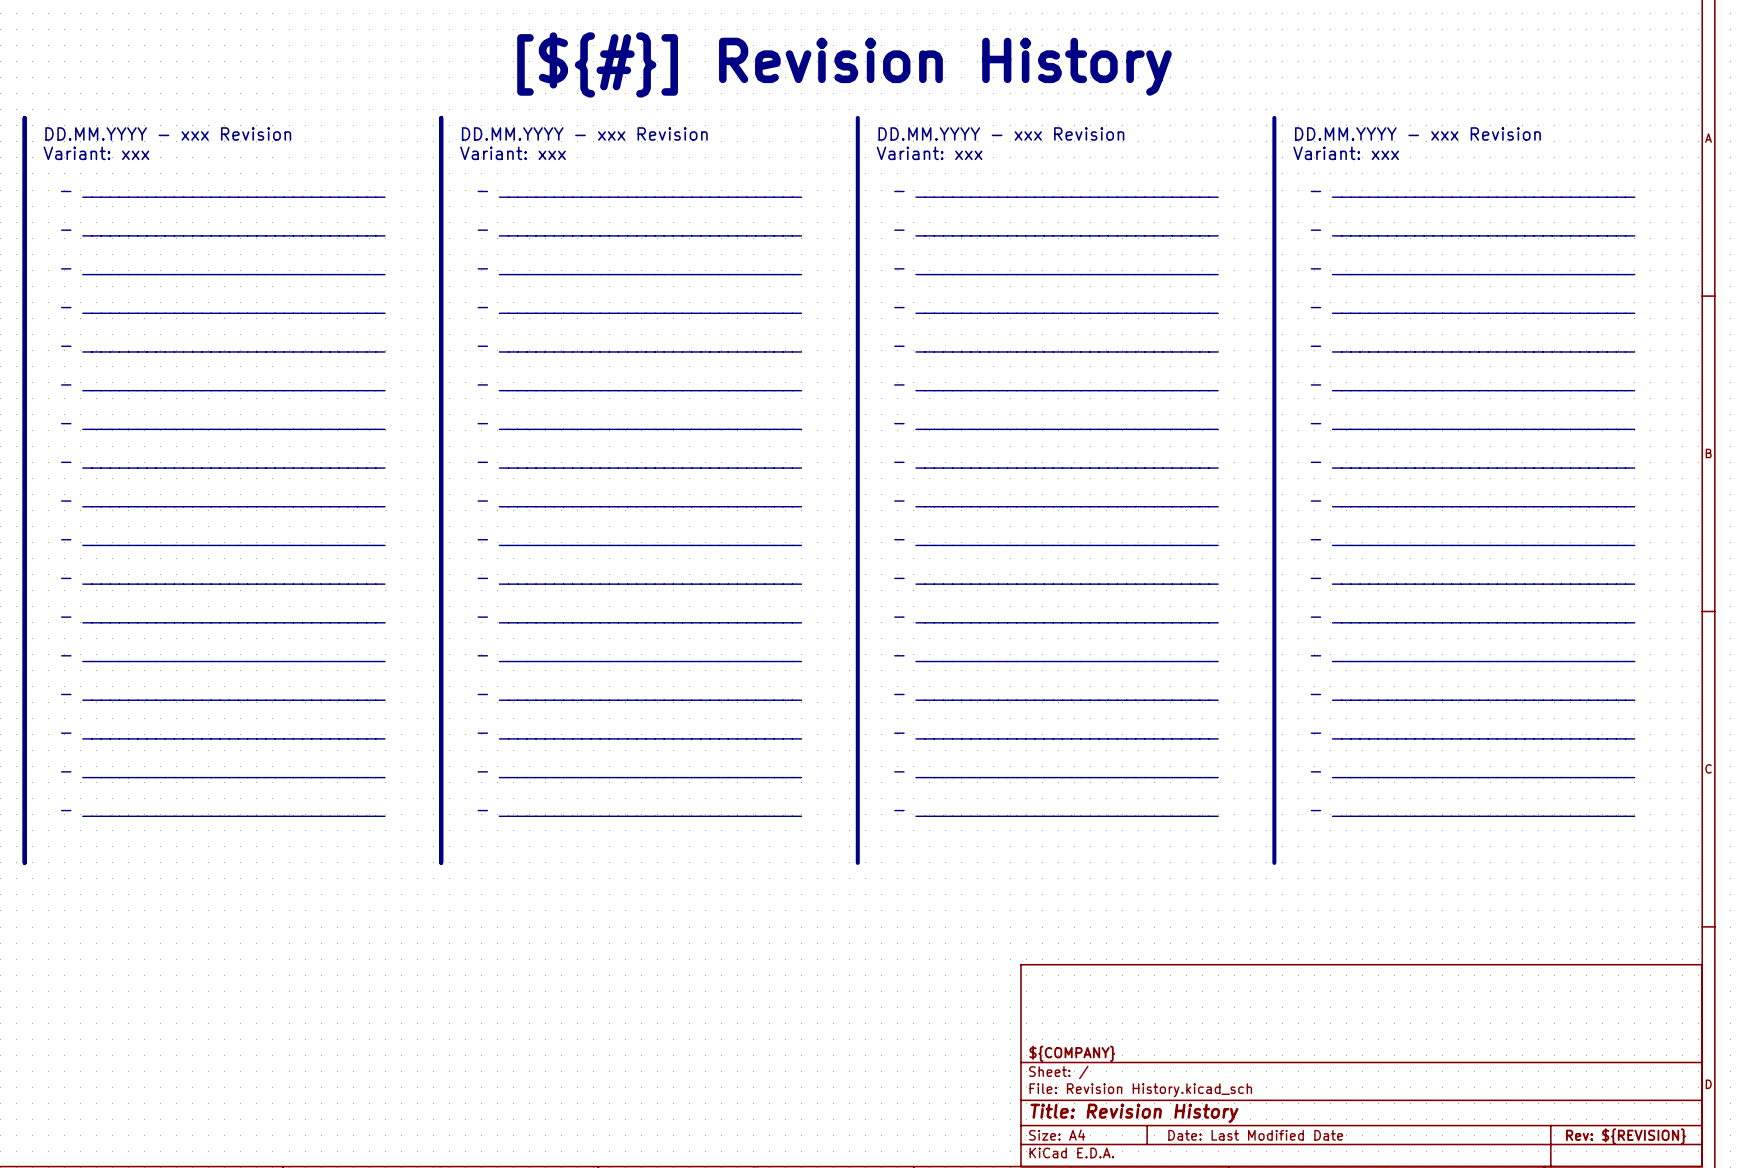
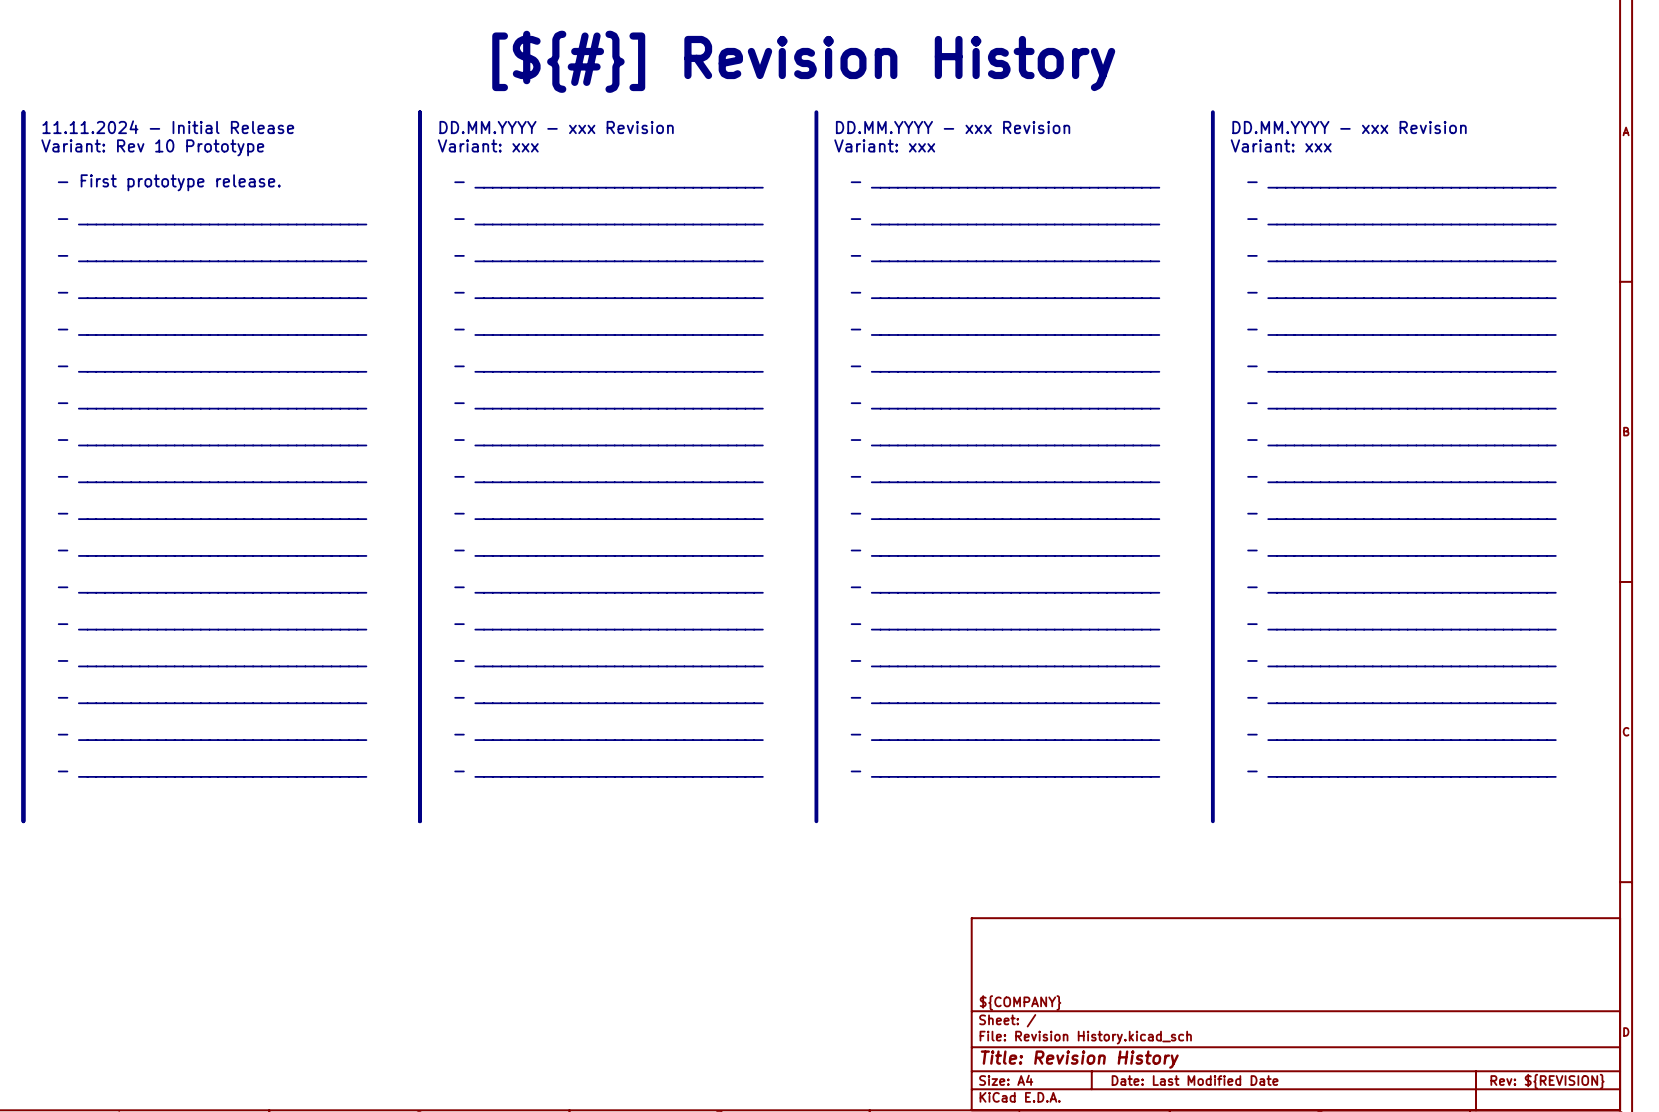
text: DD.MM.YYYY - xxx Revision (168, 133) -> 11.11.2024 - Initial Release (168, 127)
text: Variant: xxx (96, 153) -> Variant: Rev 10 Prototype (152, 147)
text: - _________________________________ (223, 194) -> - First prototype release. (169, 182)

